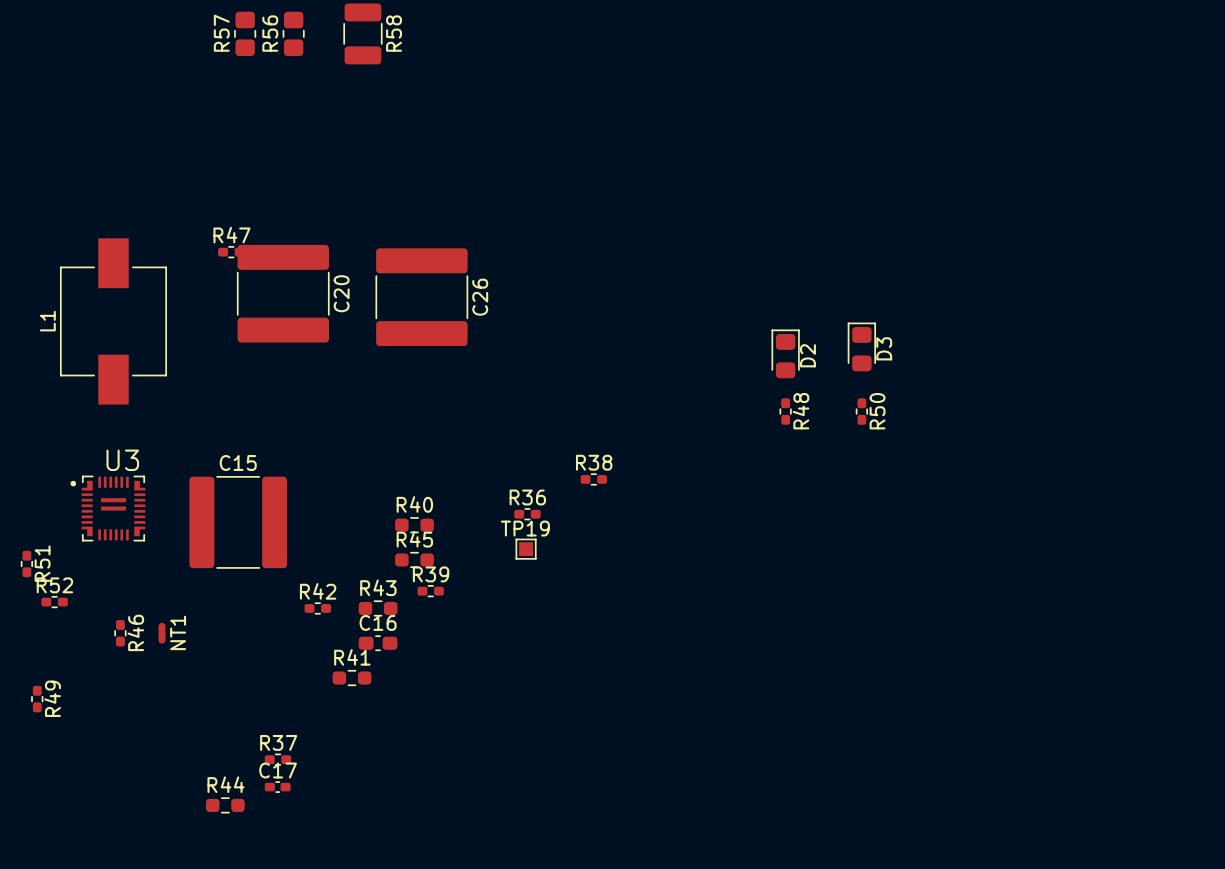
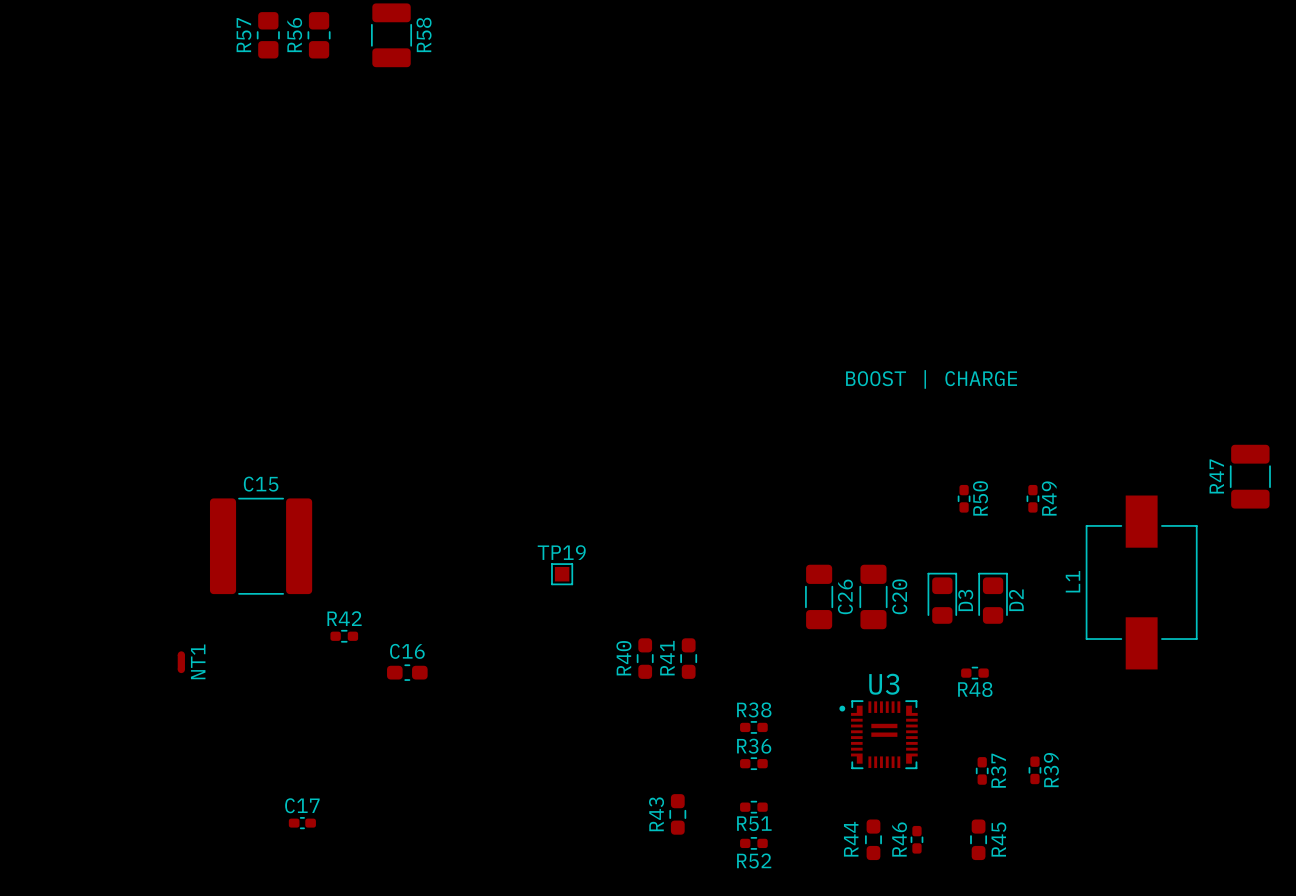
R47 name position: R47 (231, 235) -> R47 (1216, 476)
C20 footprint: [236, 244, 330, 343] -> [859, 564, 888, 630]
R47 footprint: [218, 246, 245, 259] -> [1229, 444, 1271, 509]
C26 footprint: [375, 248, 469, 347] -> [805, 564, 834, 630]
C20 name position: C20 (341, 293) -> C20 (899, 596)
C26 name position: C26 (480, 297) -> C26 (845, 596)
L1 position: (113, 321) -> (1141, 582)
D3 position: (861, 346) -> (942, 598)
D2 position: (785, 353) -> (993, 598)
text: none -> BOOST | CHARGE (931, 379)
R48 rotation: 0° (785, 411) -> 90° clockwise (974, 673)
R48 position: (785, 411) -> (974, 673)
R50 position: (861, 411) -> (964, 498)
U3 name position: U3 (122, 460) -> U3 (884, 684)
R38 position: (593, 479) -> (753, 727)
R40 name position: R40 (414, 504) -> R40 (623, 658)
U3 position: (107, 508) -> (878, 734)
R36 position: (527, 514) -> (753, 763)
R40 rotation: 0° (414, 525) -> 90° clockwise (645, 658)
R40 position: (414, 525) -> (645, 658)
R45 rotation: 0° (414, 559) -> 90° clockwise (978, 839)
R45 position: (414, 559) -> (978, 839)
R51 rotation: 0° (26, 563) -> 90° clockwise (753, 807)
R51 position: (26, 563) -> (753, 807)
R52 name position: R52 (54, 585) -> R52 (754, 860)
R43 name position: R43 (378, 587) -> R43 (656, 814)
R39 rotation: 0° (430, 591) -> 90° clockwise (1034, 770)
R39 position: (430, 591) -> (1034, 770)
R52 position: (54, 602) -> (753, 843)
R43 rotation: 0° (378, 608) -> 90° clockwise (677, 814)
R43 position: (378, 608) -> (677, 814)
R46 name position: R46 (135, 632) -> R46 (899, 839)
R46 position: (120, 633) -> (916, 839)
R41 name position: R41 (352, 657) -> R41 (667, 658)
R41 rotation: 0° (352, 678) -> 90° clockwise (688, 658)
R41 position: (352, 678) -> (688, 658)
R49 position: (37, 699) -> (1032, 498)
R37 rotation: 0° (278, 759) -> 90° clockwise (982, 770)
R37 position: (278, 759) -> (982, 770)
R44 name position: R44 (226, 784) -> R44 (851, 839)
R44 rotation: 0° (225, 805) -> 90° clockwise (873, 839)
R44 position: (225, 805) -> (873, 839)

